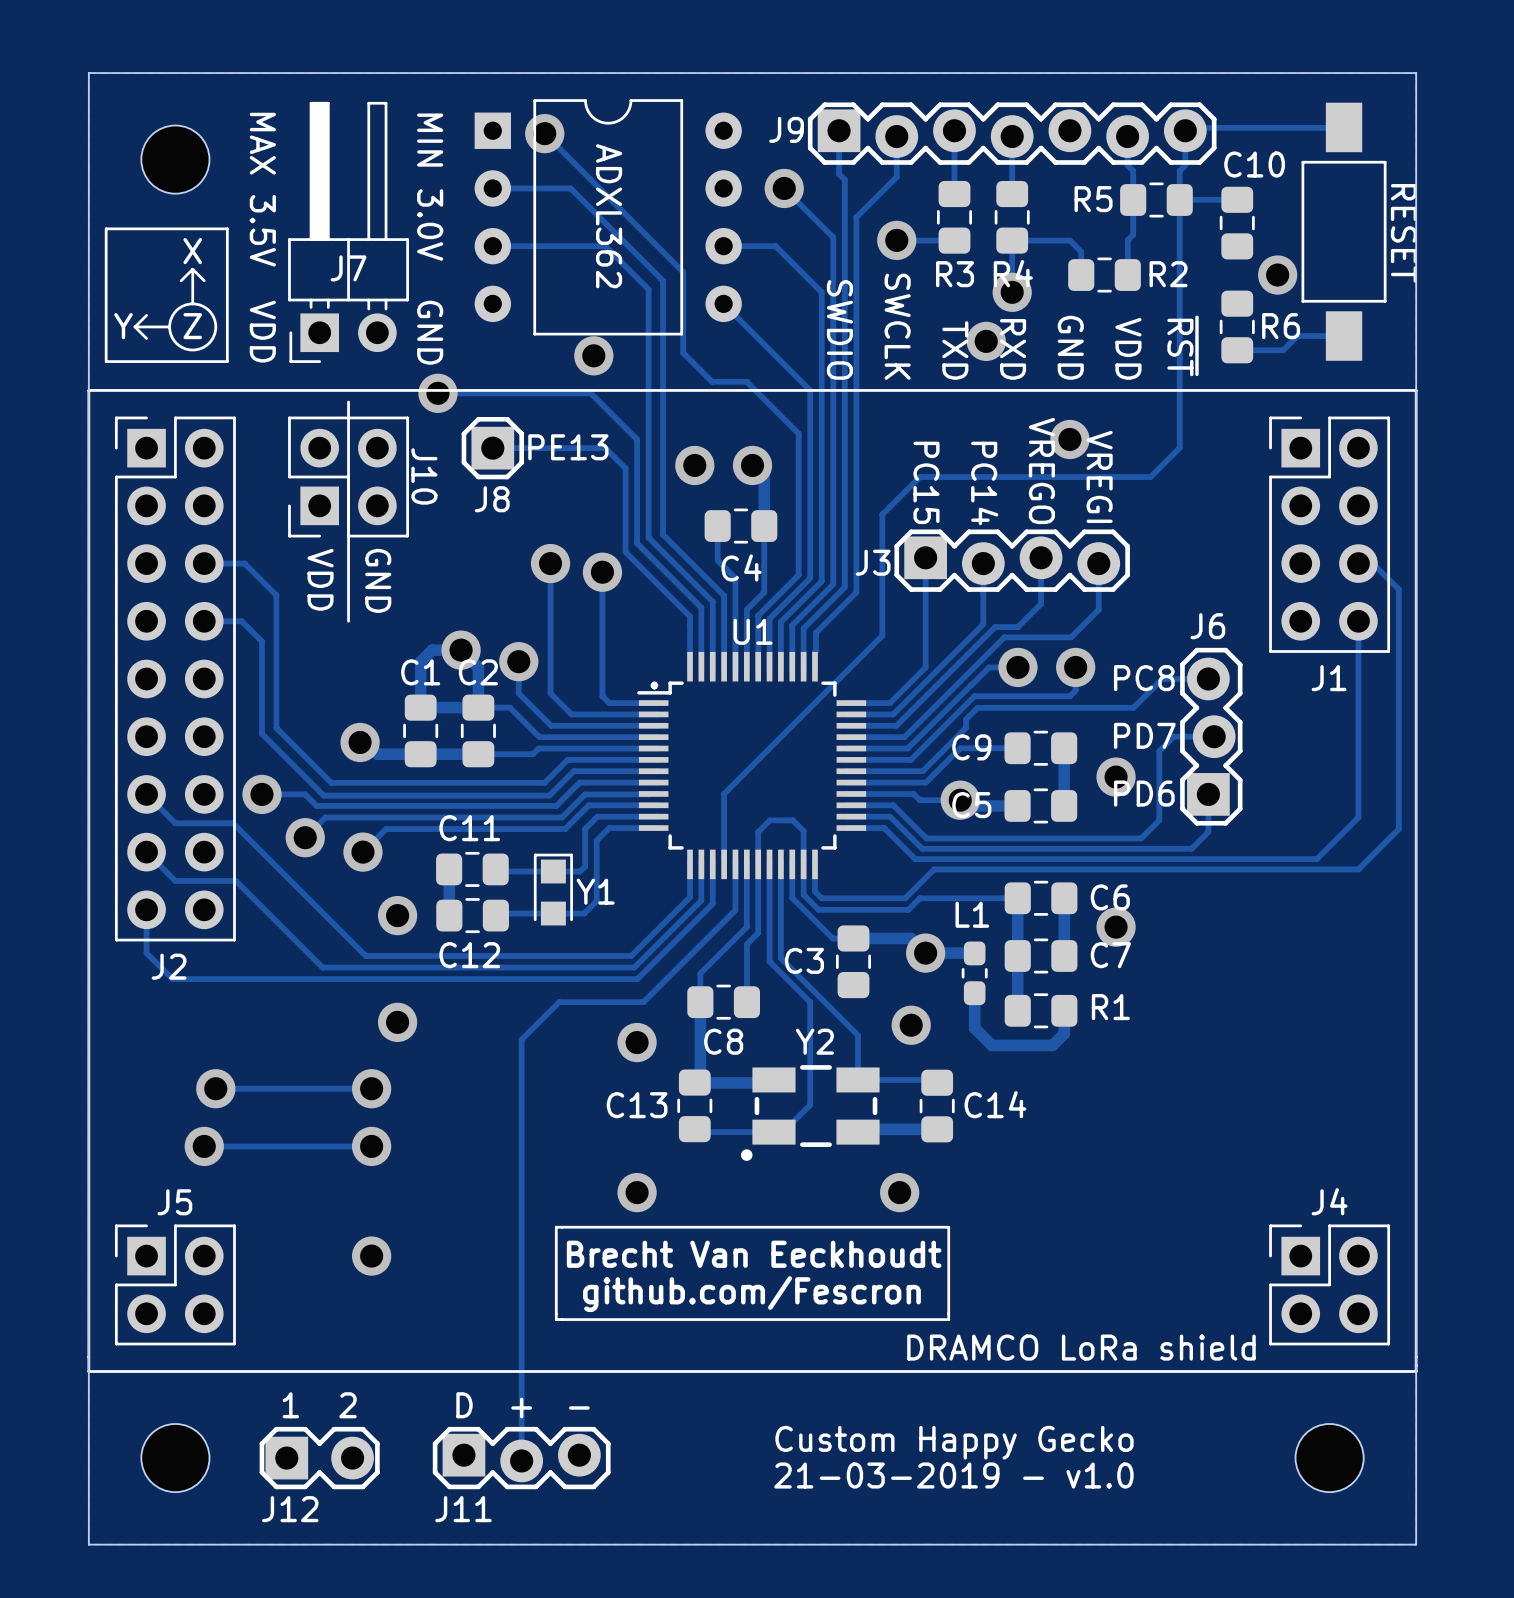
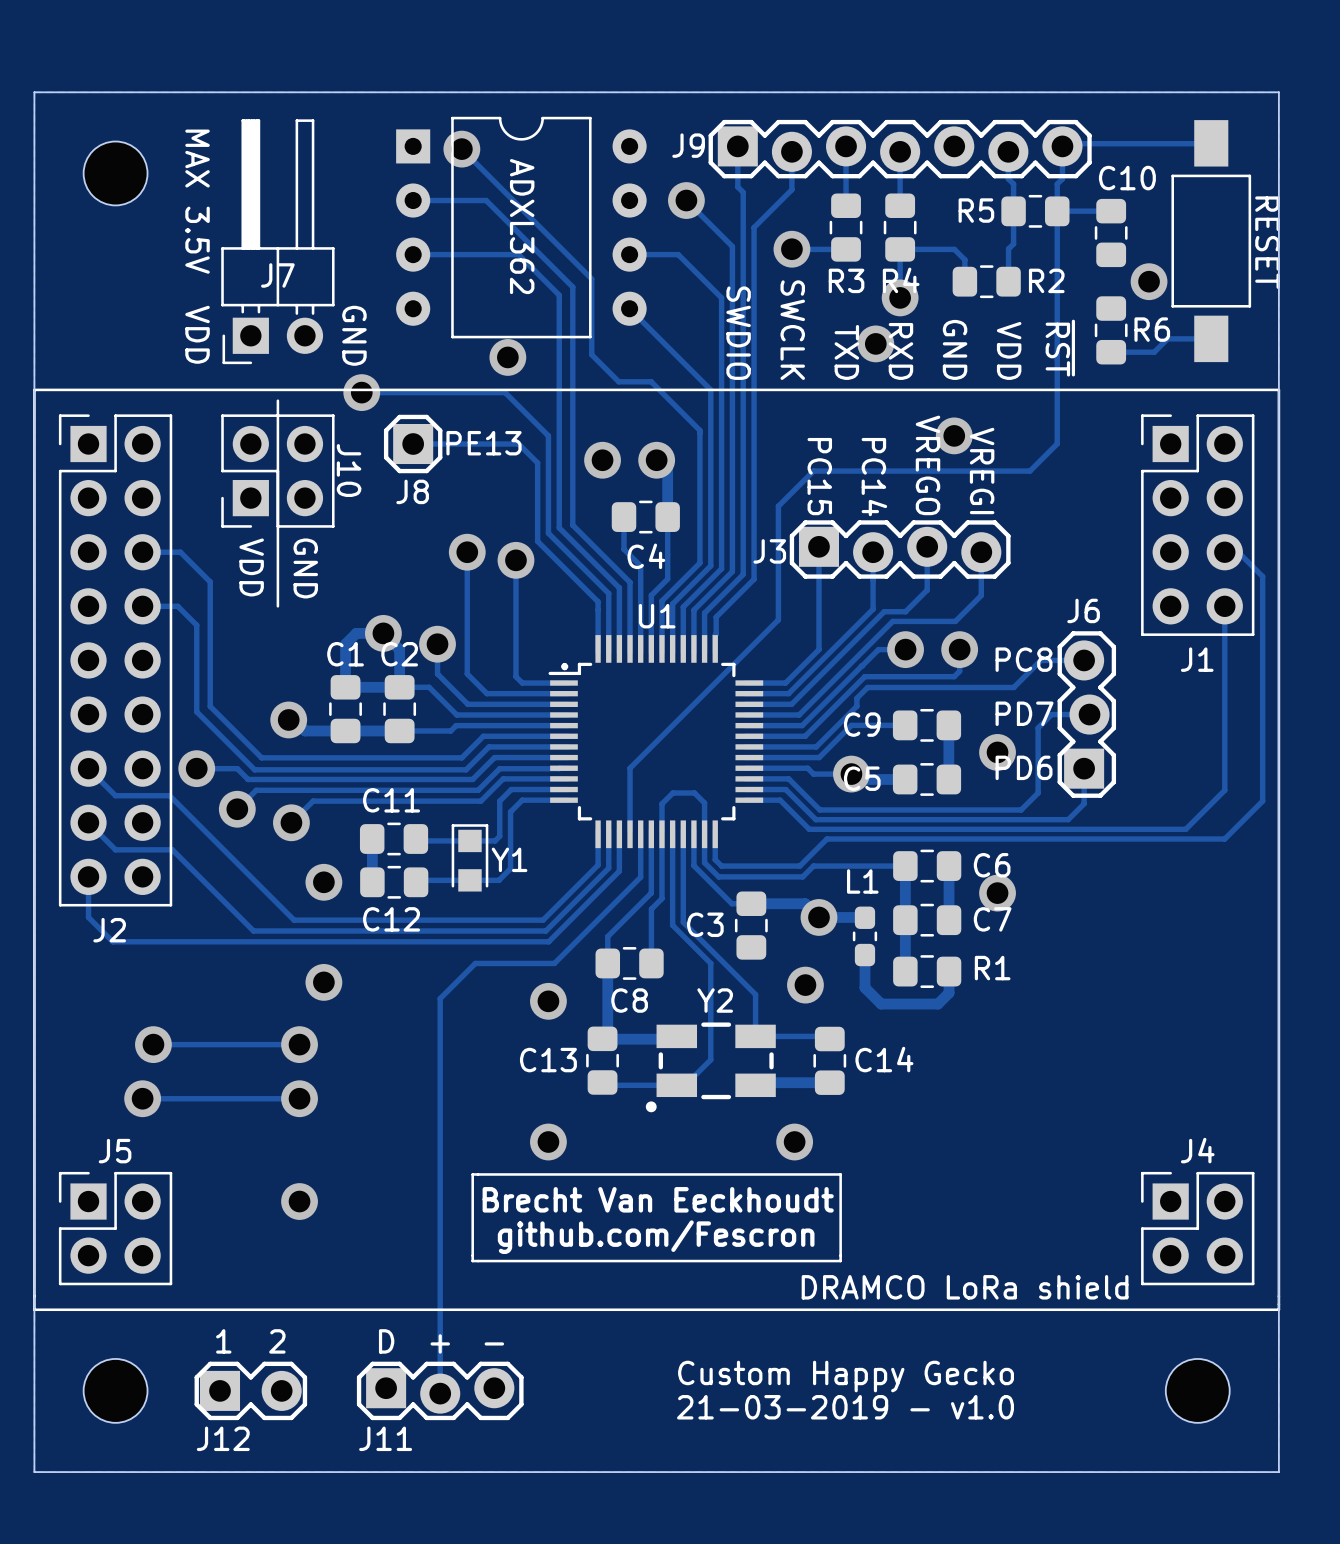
text: MIN 3.0V (430, 187) -> none
line: (106, 228) (106, 361) (227, 361) (227, 228) (106, 228) -> none
text: X (192, 251) -> none
line: (192, 269) (181, 280) -> none
line: (192, 269) (204, 280) -> none
line: (192, 269) (192, 303) -> none
drawing: [168, 302, 218, 352] -> none
line: (146, 315) (135, 326) -> none
text: Y (123, 326) -> none
line: (135, 326) (169, 326) -> none
line: (135, 326) (146, 338) -> none
text: Z (192, 326) -> none

